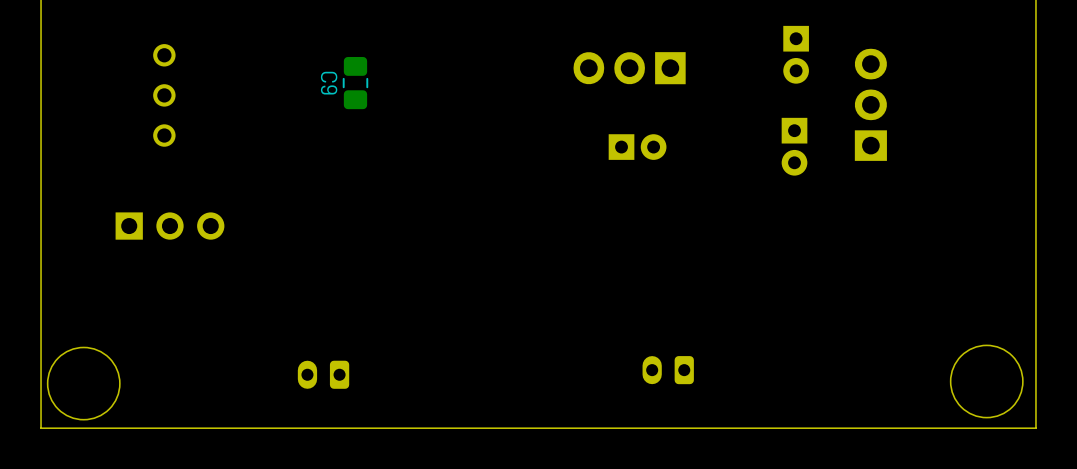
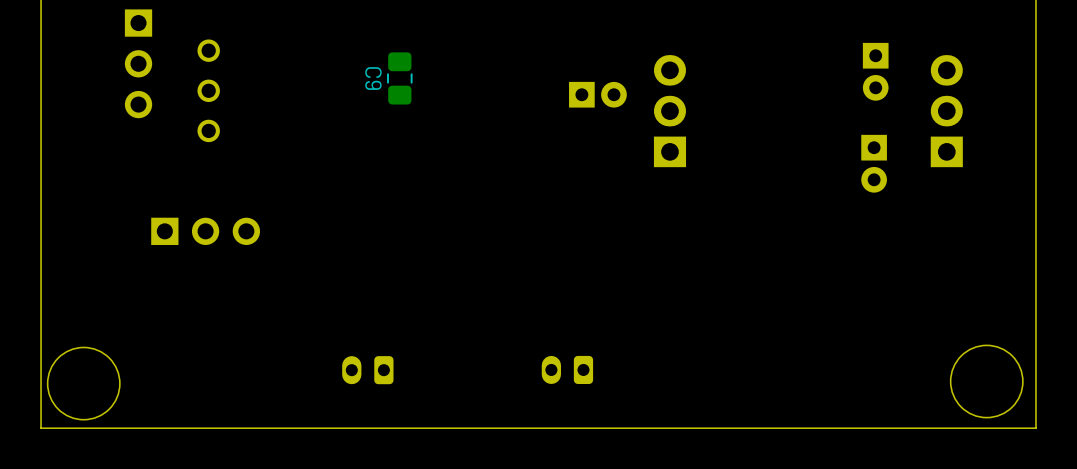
part: (796, 54) -> none
part: none -> (138, 63)
part rotation: 0° (629, 68) -> 90° clockwise (669, 111)
part: none -> (875, 71)
C9 position: (355, 83) -> (399, 78)
part position: (164, 95) -> (208, 90)
part position: (870, 104) -> (946, 111)
part: (794, 146) -> none
part position: (637, 147) -> (597, 94)
part: none -> (874, 163)
part position: (169, 226) -> (205, 231)
part position: (668, 370) -> (567, 369)
part position: (323, 374) -> (367, 370)

